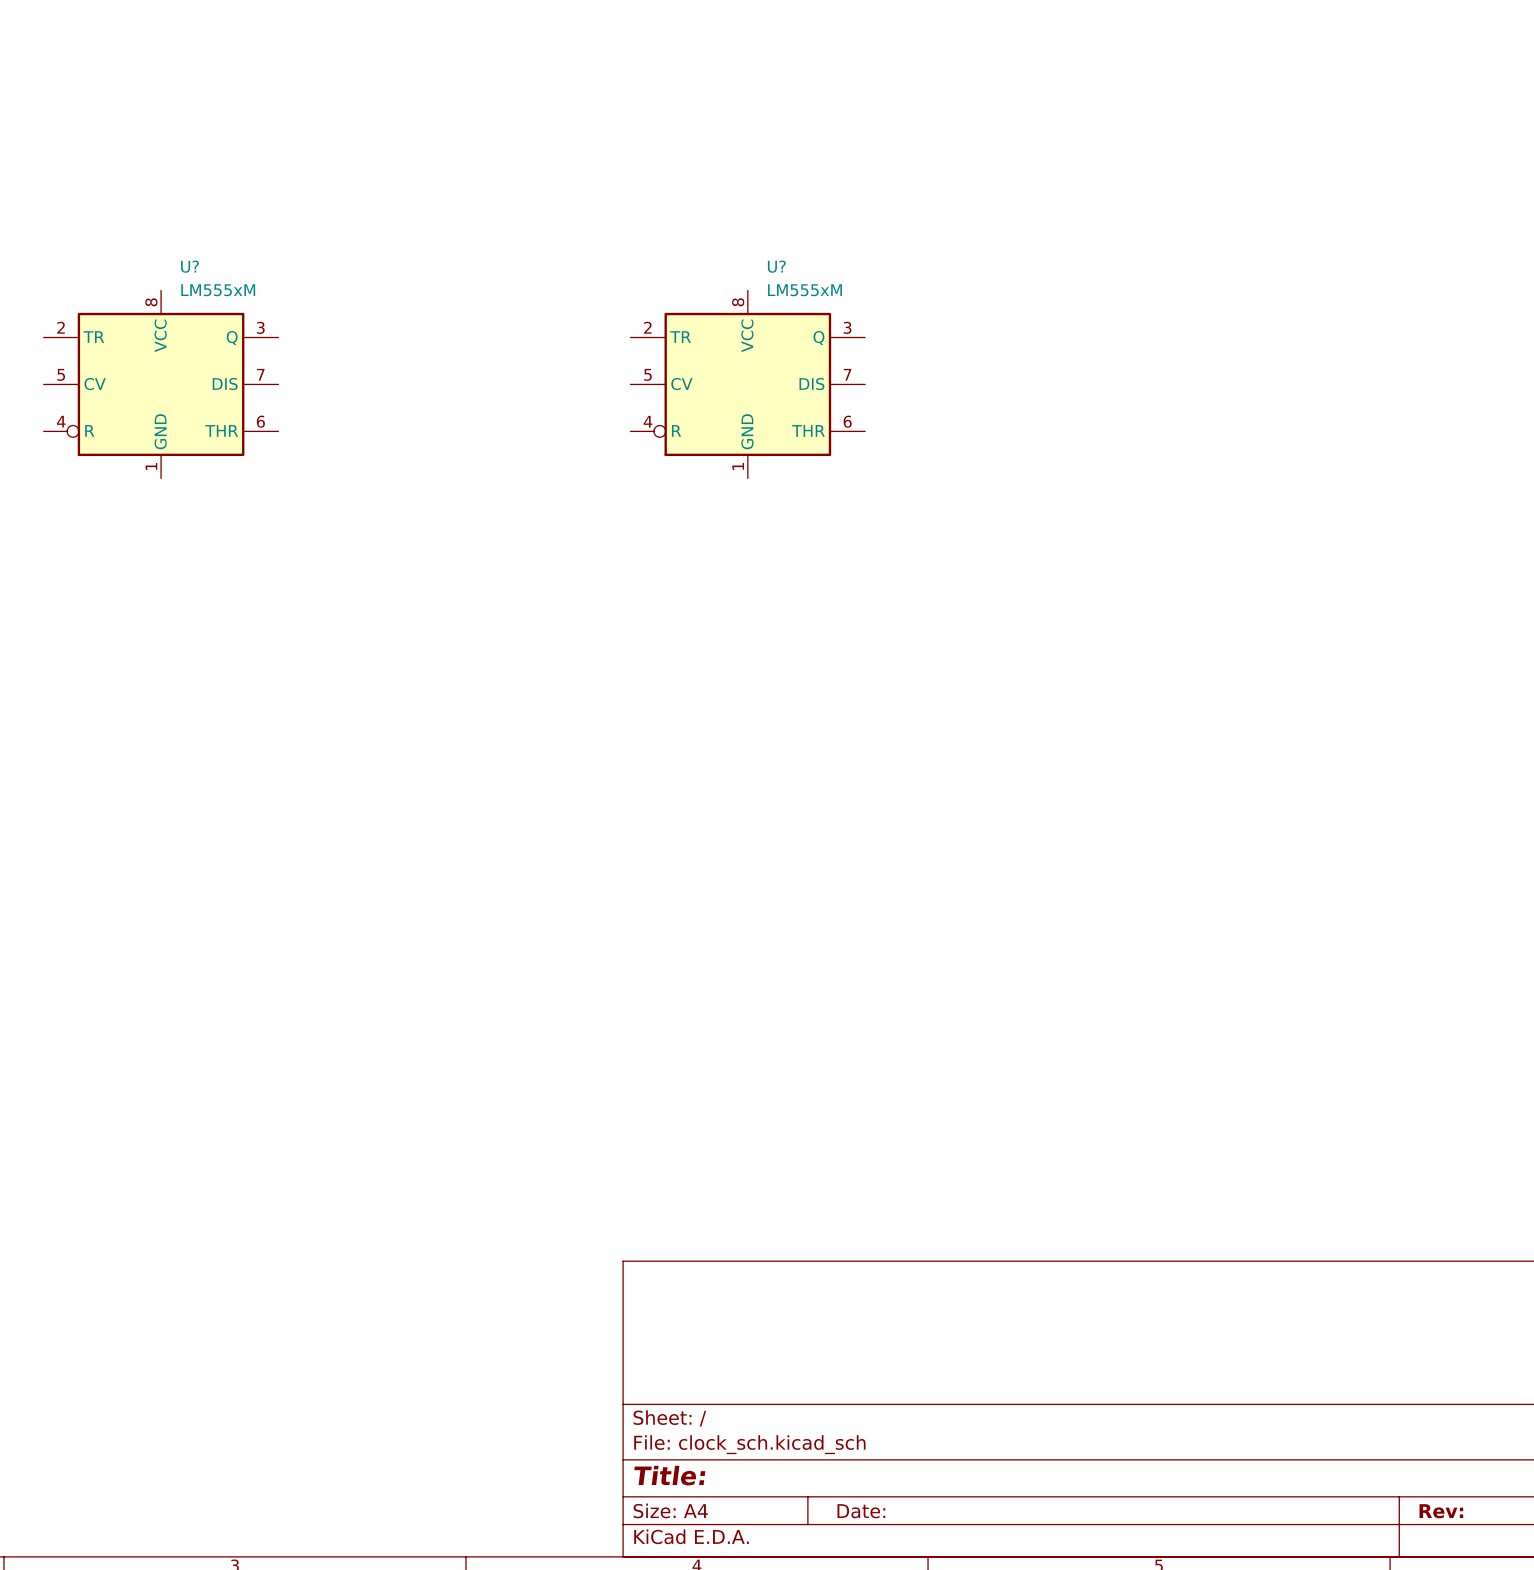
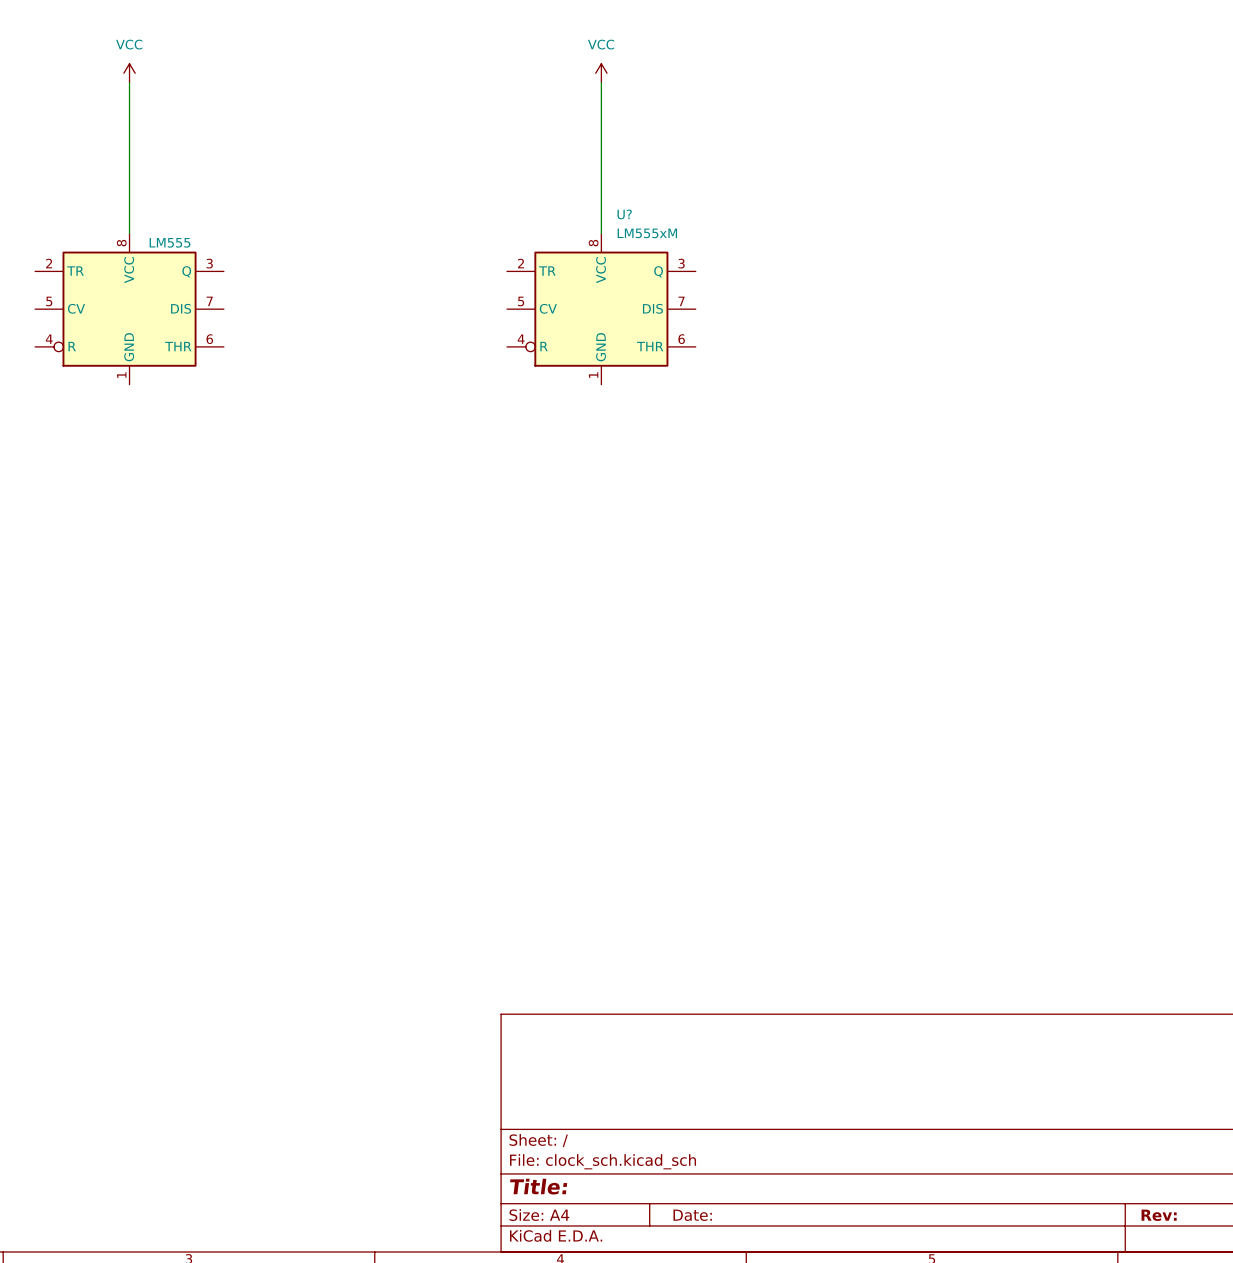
power symbol: none -> VCC (129, 73)
power symbol: none -> VCC (601, 73)
wire: none -> (129, 82) (129, 233)
wire: none -> (601, 82) (601, 233)
U? name: U? (190, 266) -> none
U? value: LM555xM (218, 290) -> LM555 (170, 242)

